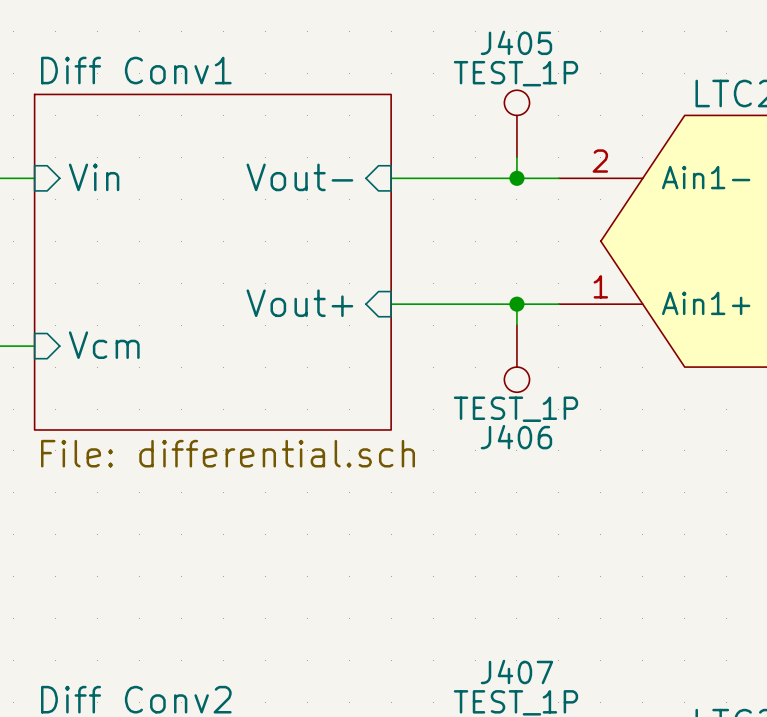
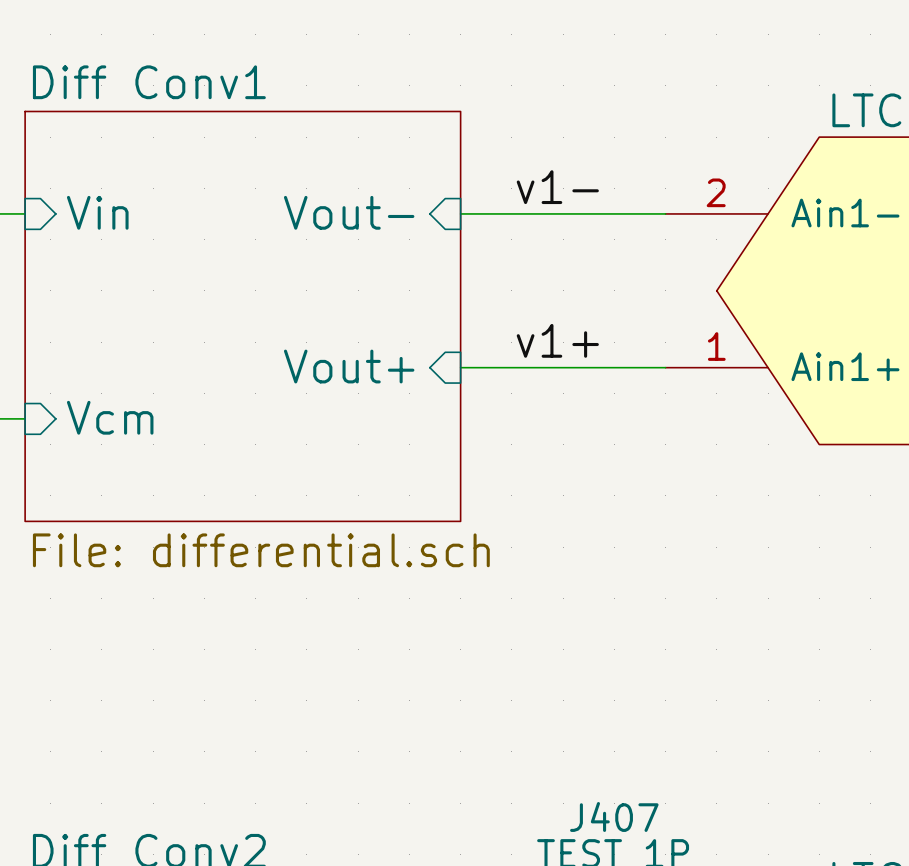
J405: TEST_1P (516, 123) -> none
label: none -> v1- (557, 187)
wire: (516, 157) (516, 178) -> none
junction: (516, 178) -> none
label: none -> v1+ (557, 340)
wire: (516, 304) (516, 325) -> none
junction: (516, 304) -> none
J406: TEST_1P (516, 358) -> none

